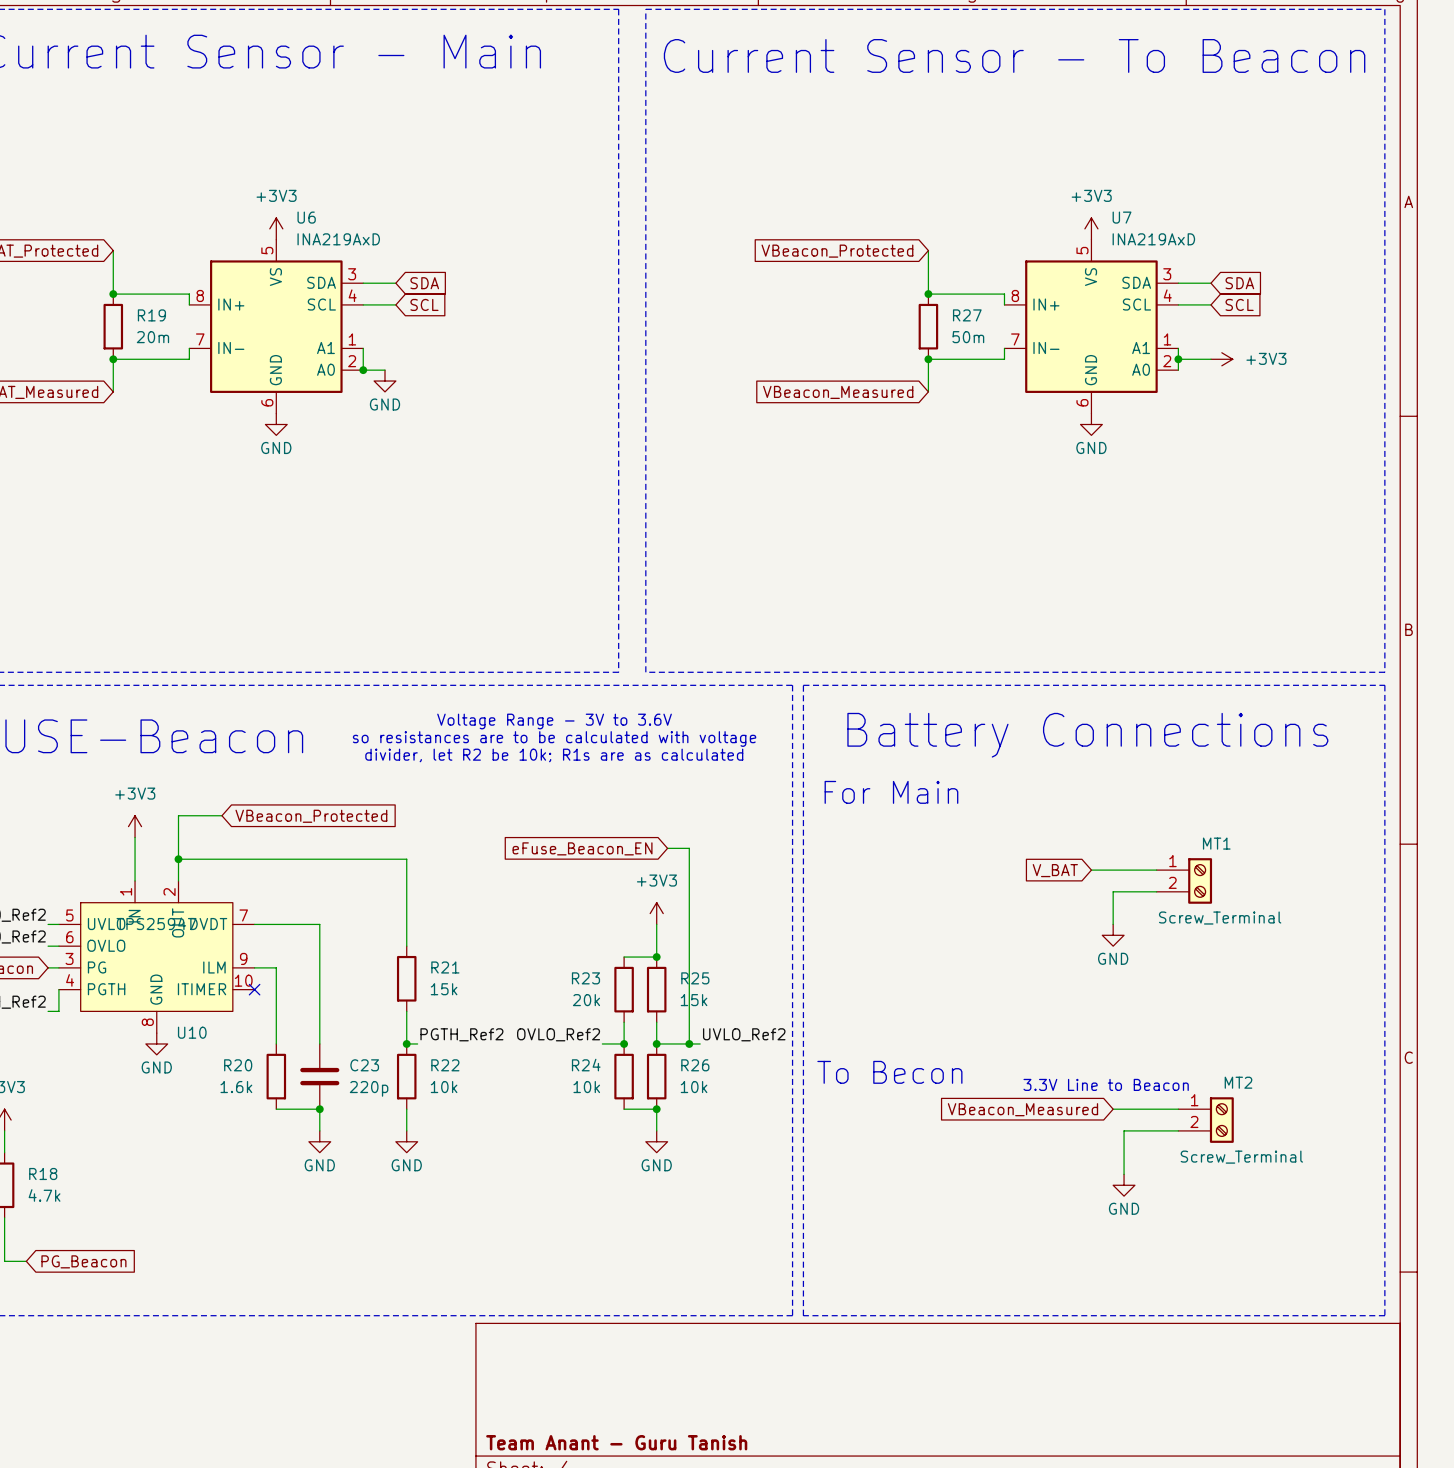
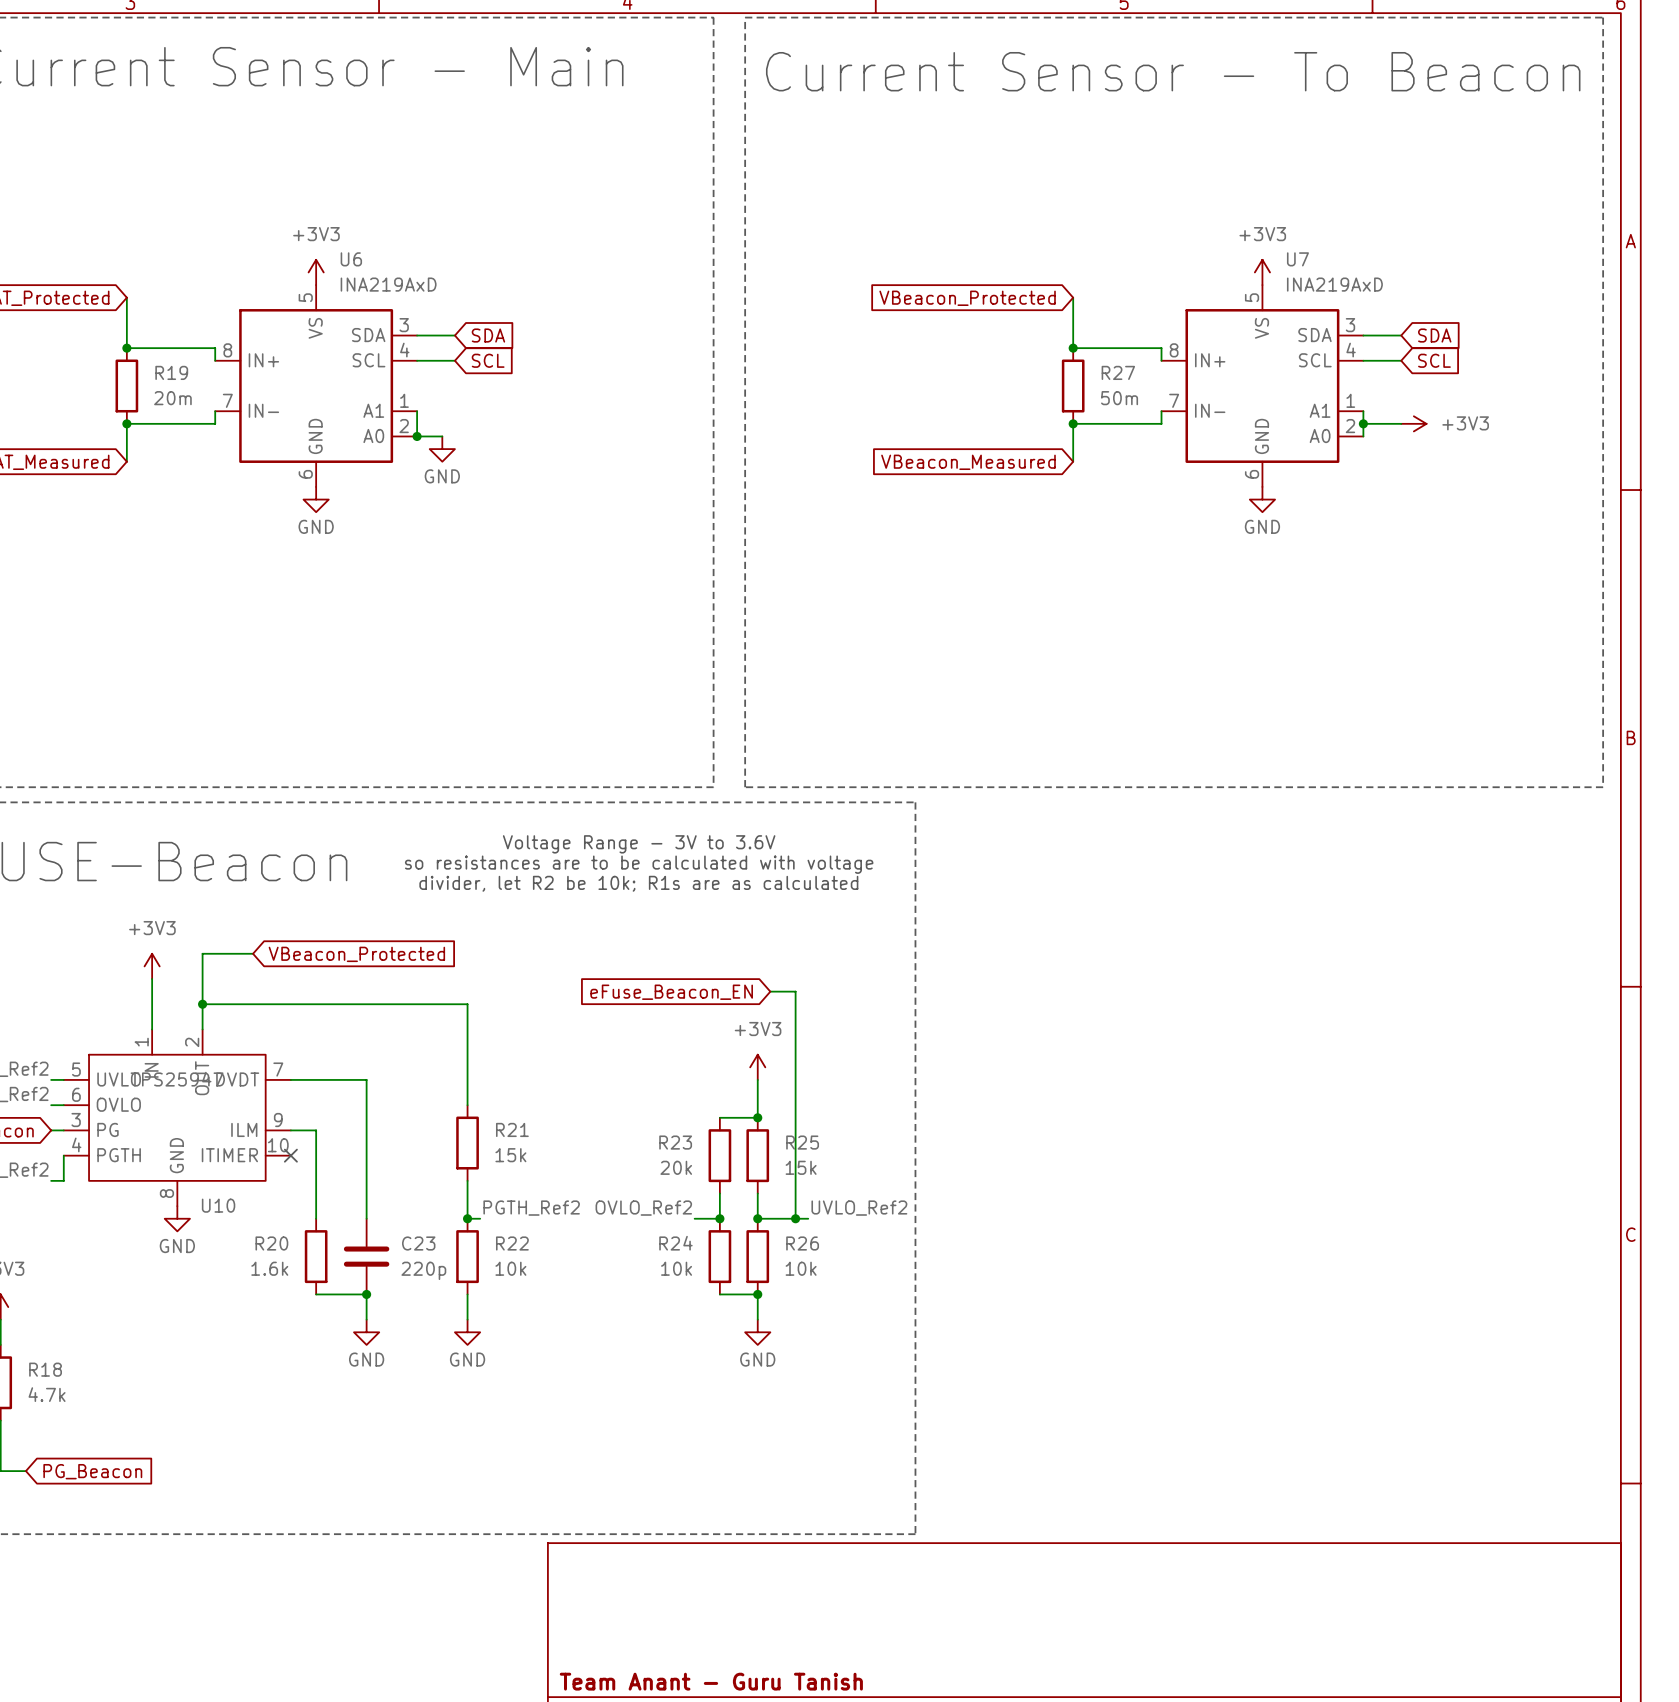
line: (803, 685) (1384, 685) (1384, 1315) (803, 1315) (803, 685) -> none
text: Battery Connections (1087, 735) -> none
text: For Main (891, 792) -> none
global label: V_BAT (1055, 870) -> none
wire: (1091, 870) (1156, 870) -> none
MT1: Screw_Terminal (1184, 880) -> none
wire: (1156, 891) (1113, 891) (1113, 924) -> none
power symbol: GND (1113, 935) -> none
text: To Becon (889, 1072) -> none
text: 3.3V Line to Beacon (1106, 1084) -> none
global label: VBeacon_Measured (1022, 1109) -> none
wire: (1113, 1109) (1178, 1109) -> none
MT2: Screw_Terminal (1206, 1120) -> none
wire: (1178, 1130) (1124, 1130) (1124, 1174) -> none
power symbol: GND (1124, 1185) -> none

